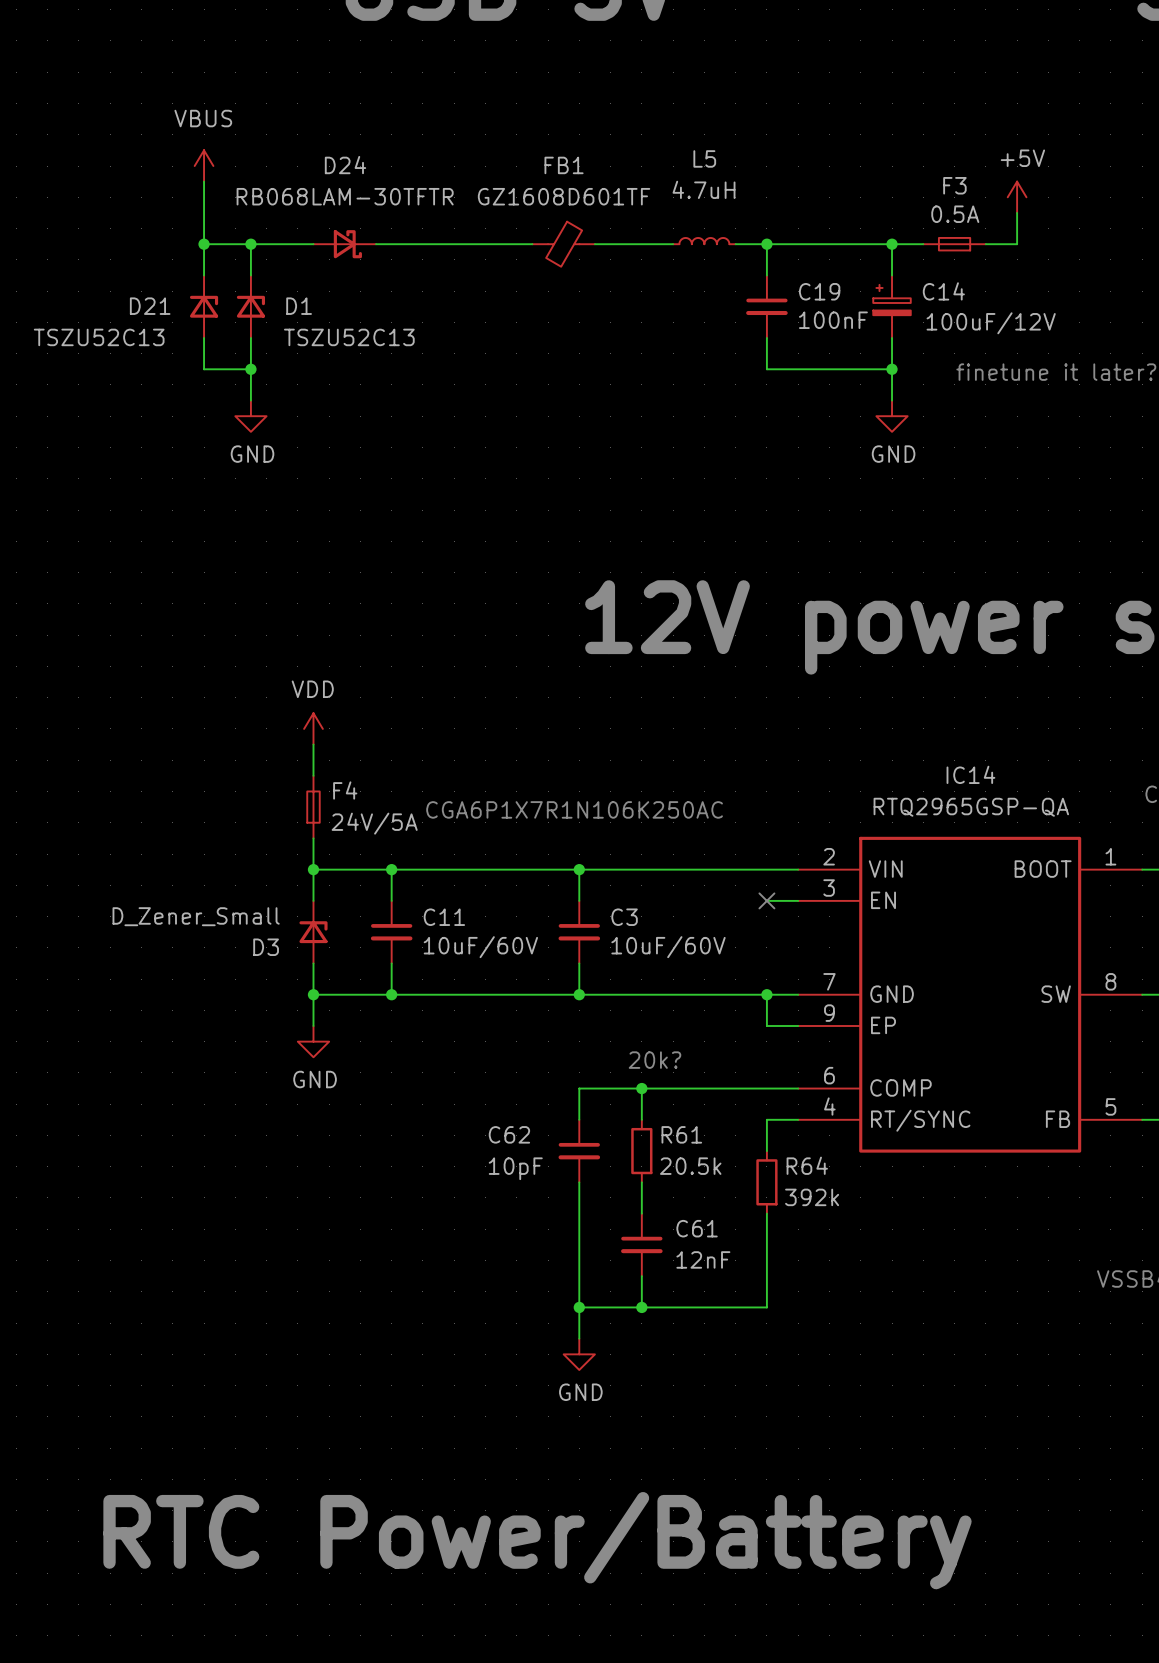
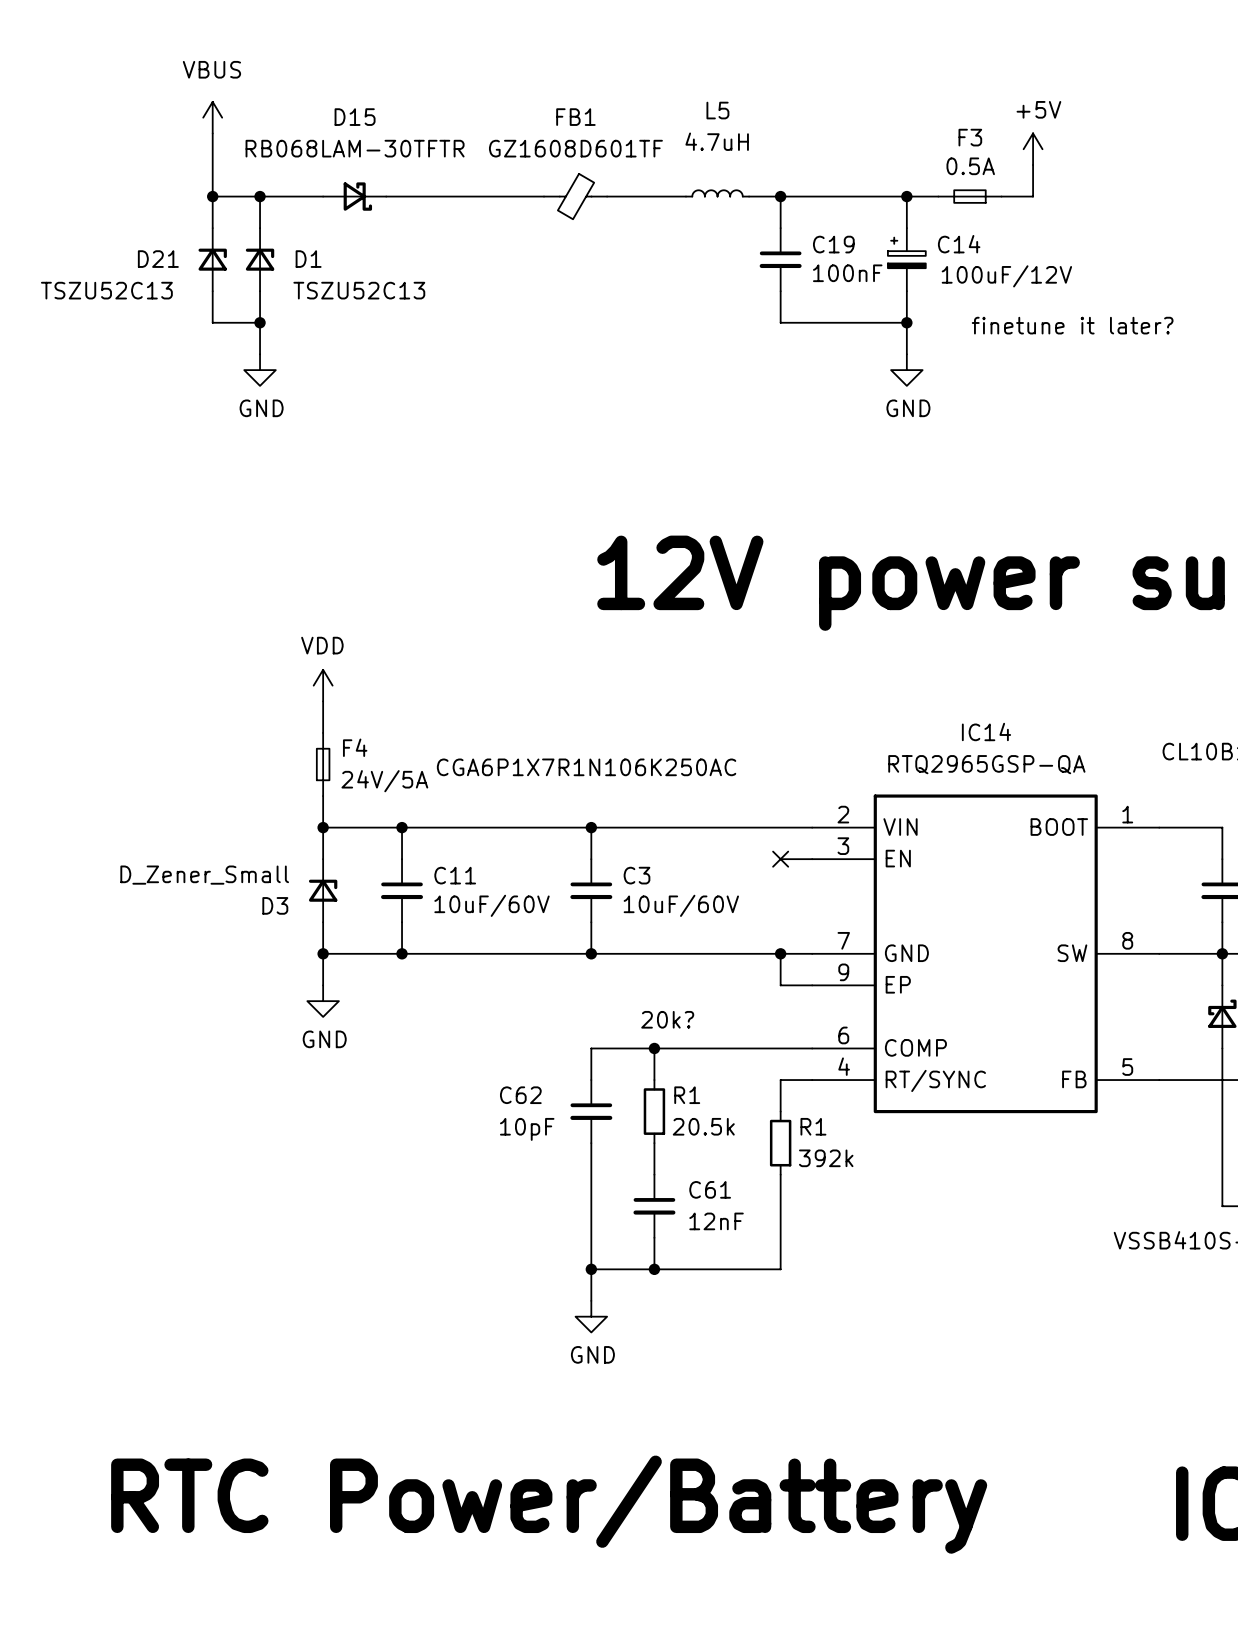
D24 name: D24 (345, 165) -> D15 (355, 117)
R61 name: R61 (681, 1134) -> R1 (687, 1095)
R64 name: R64 (807, 1165) -> R1 (813, 1126)

